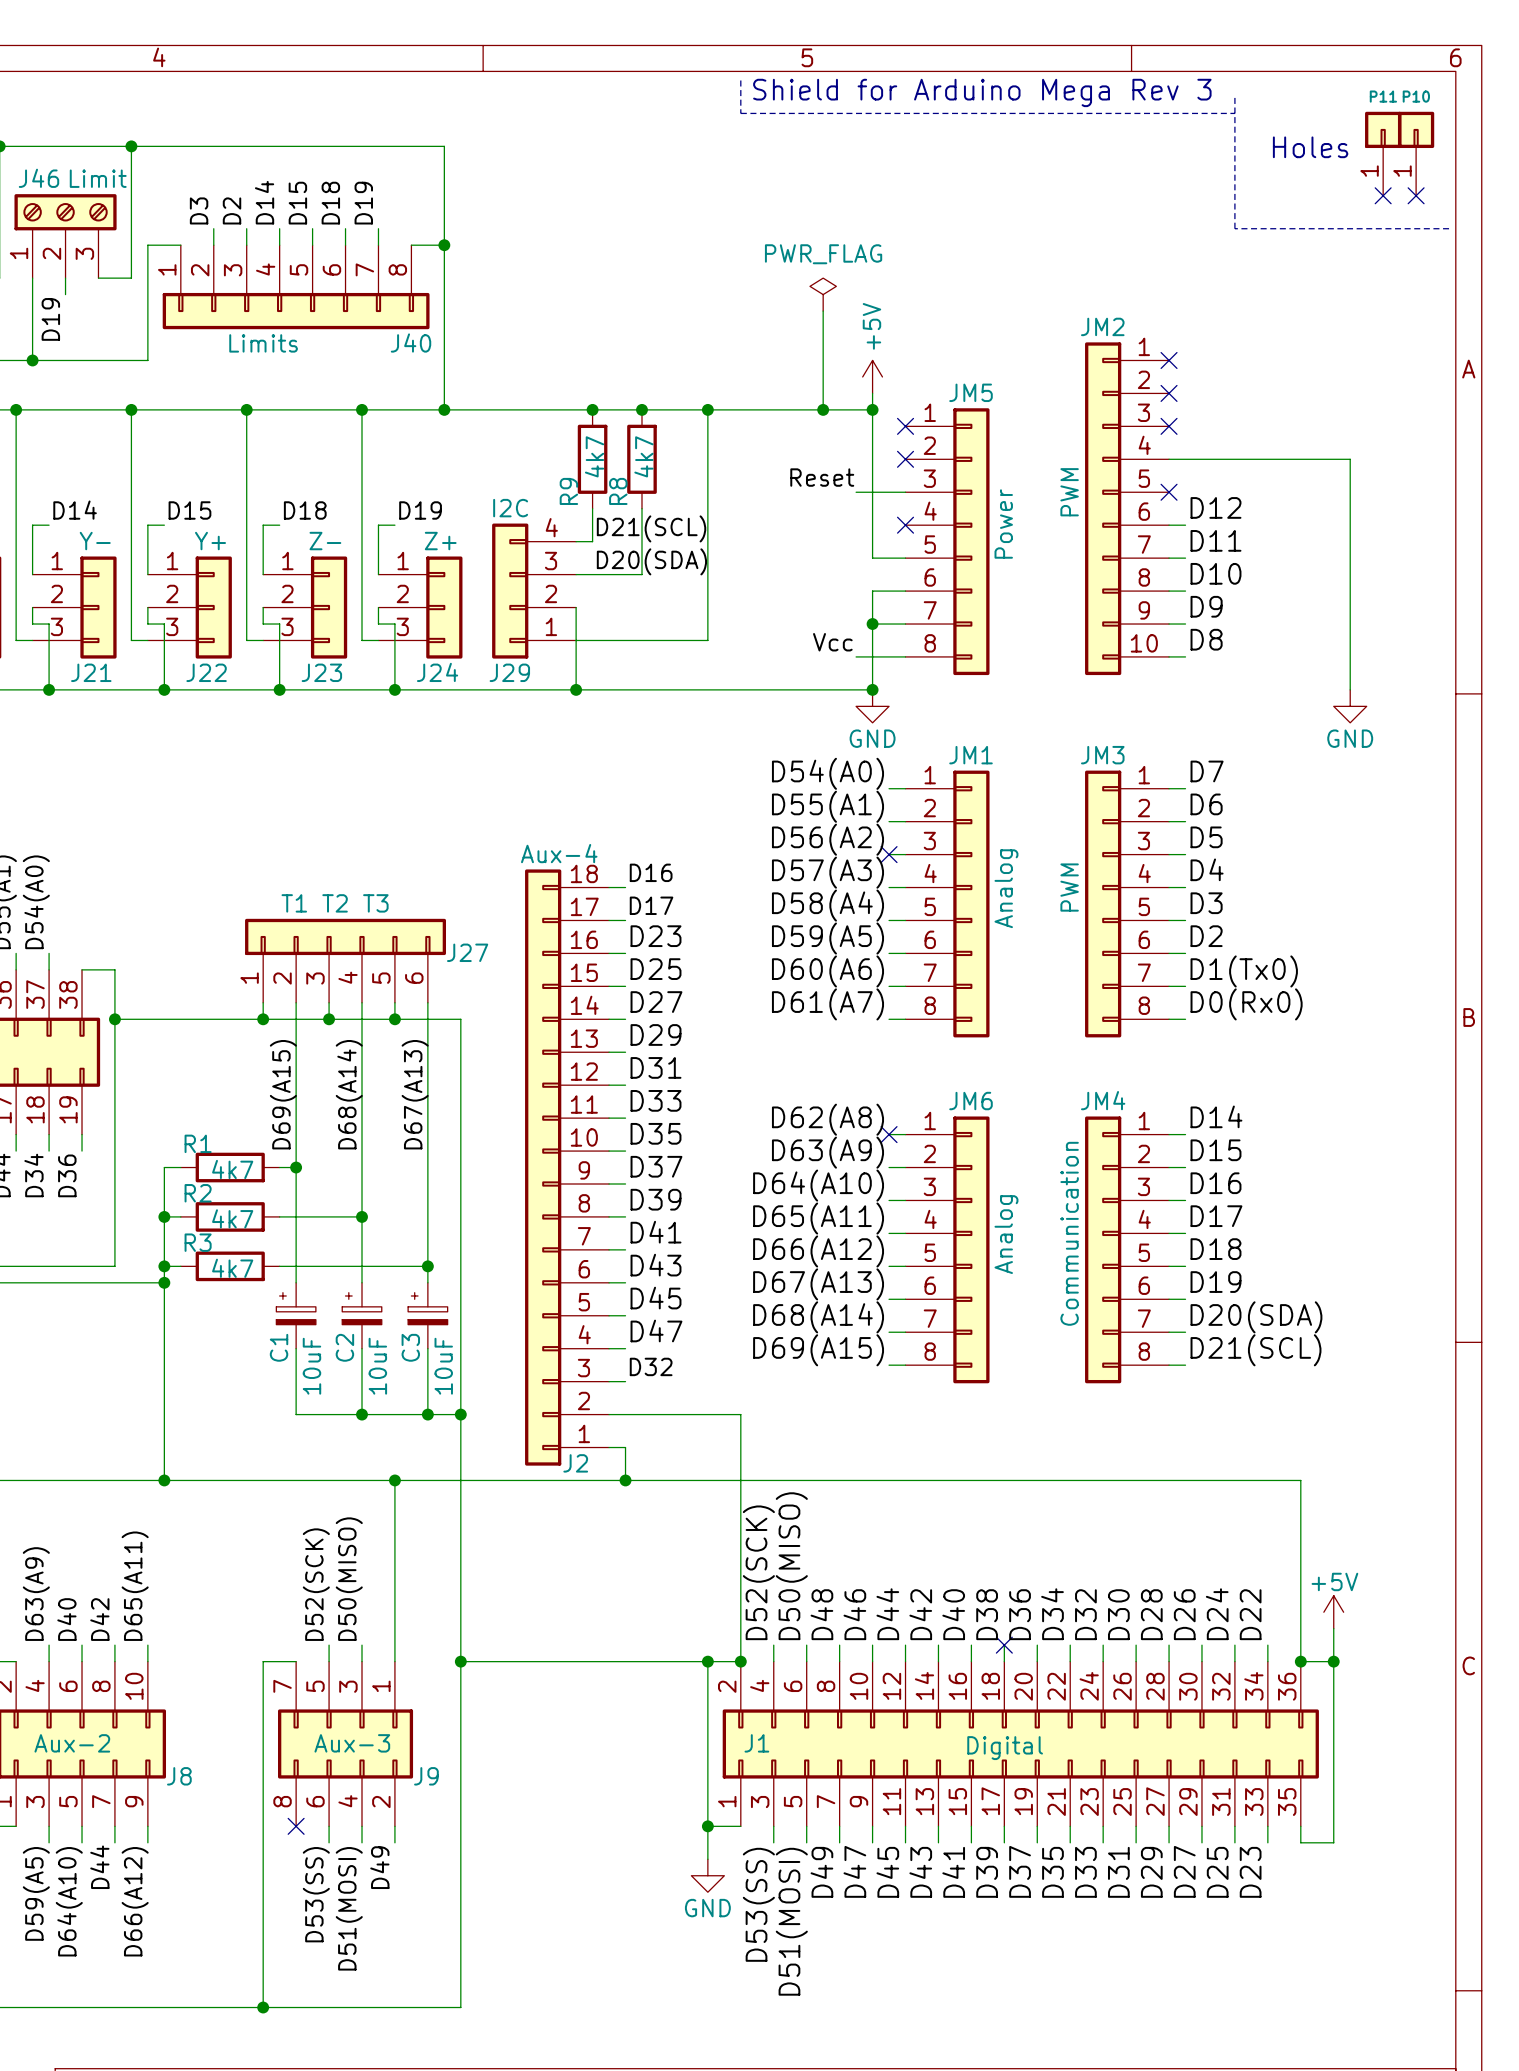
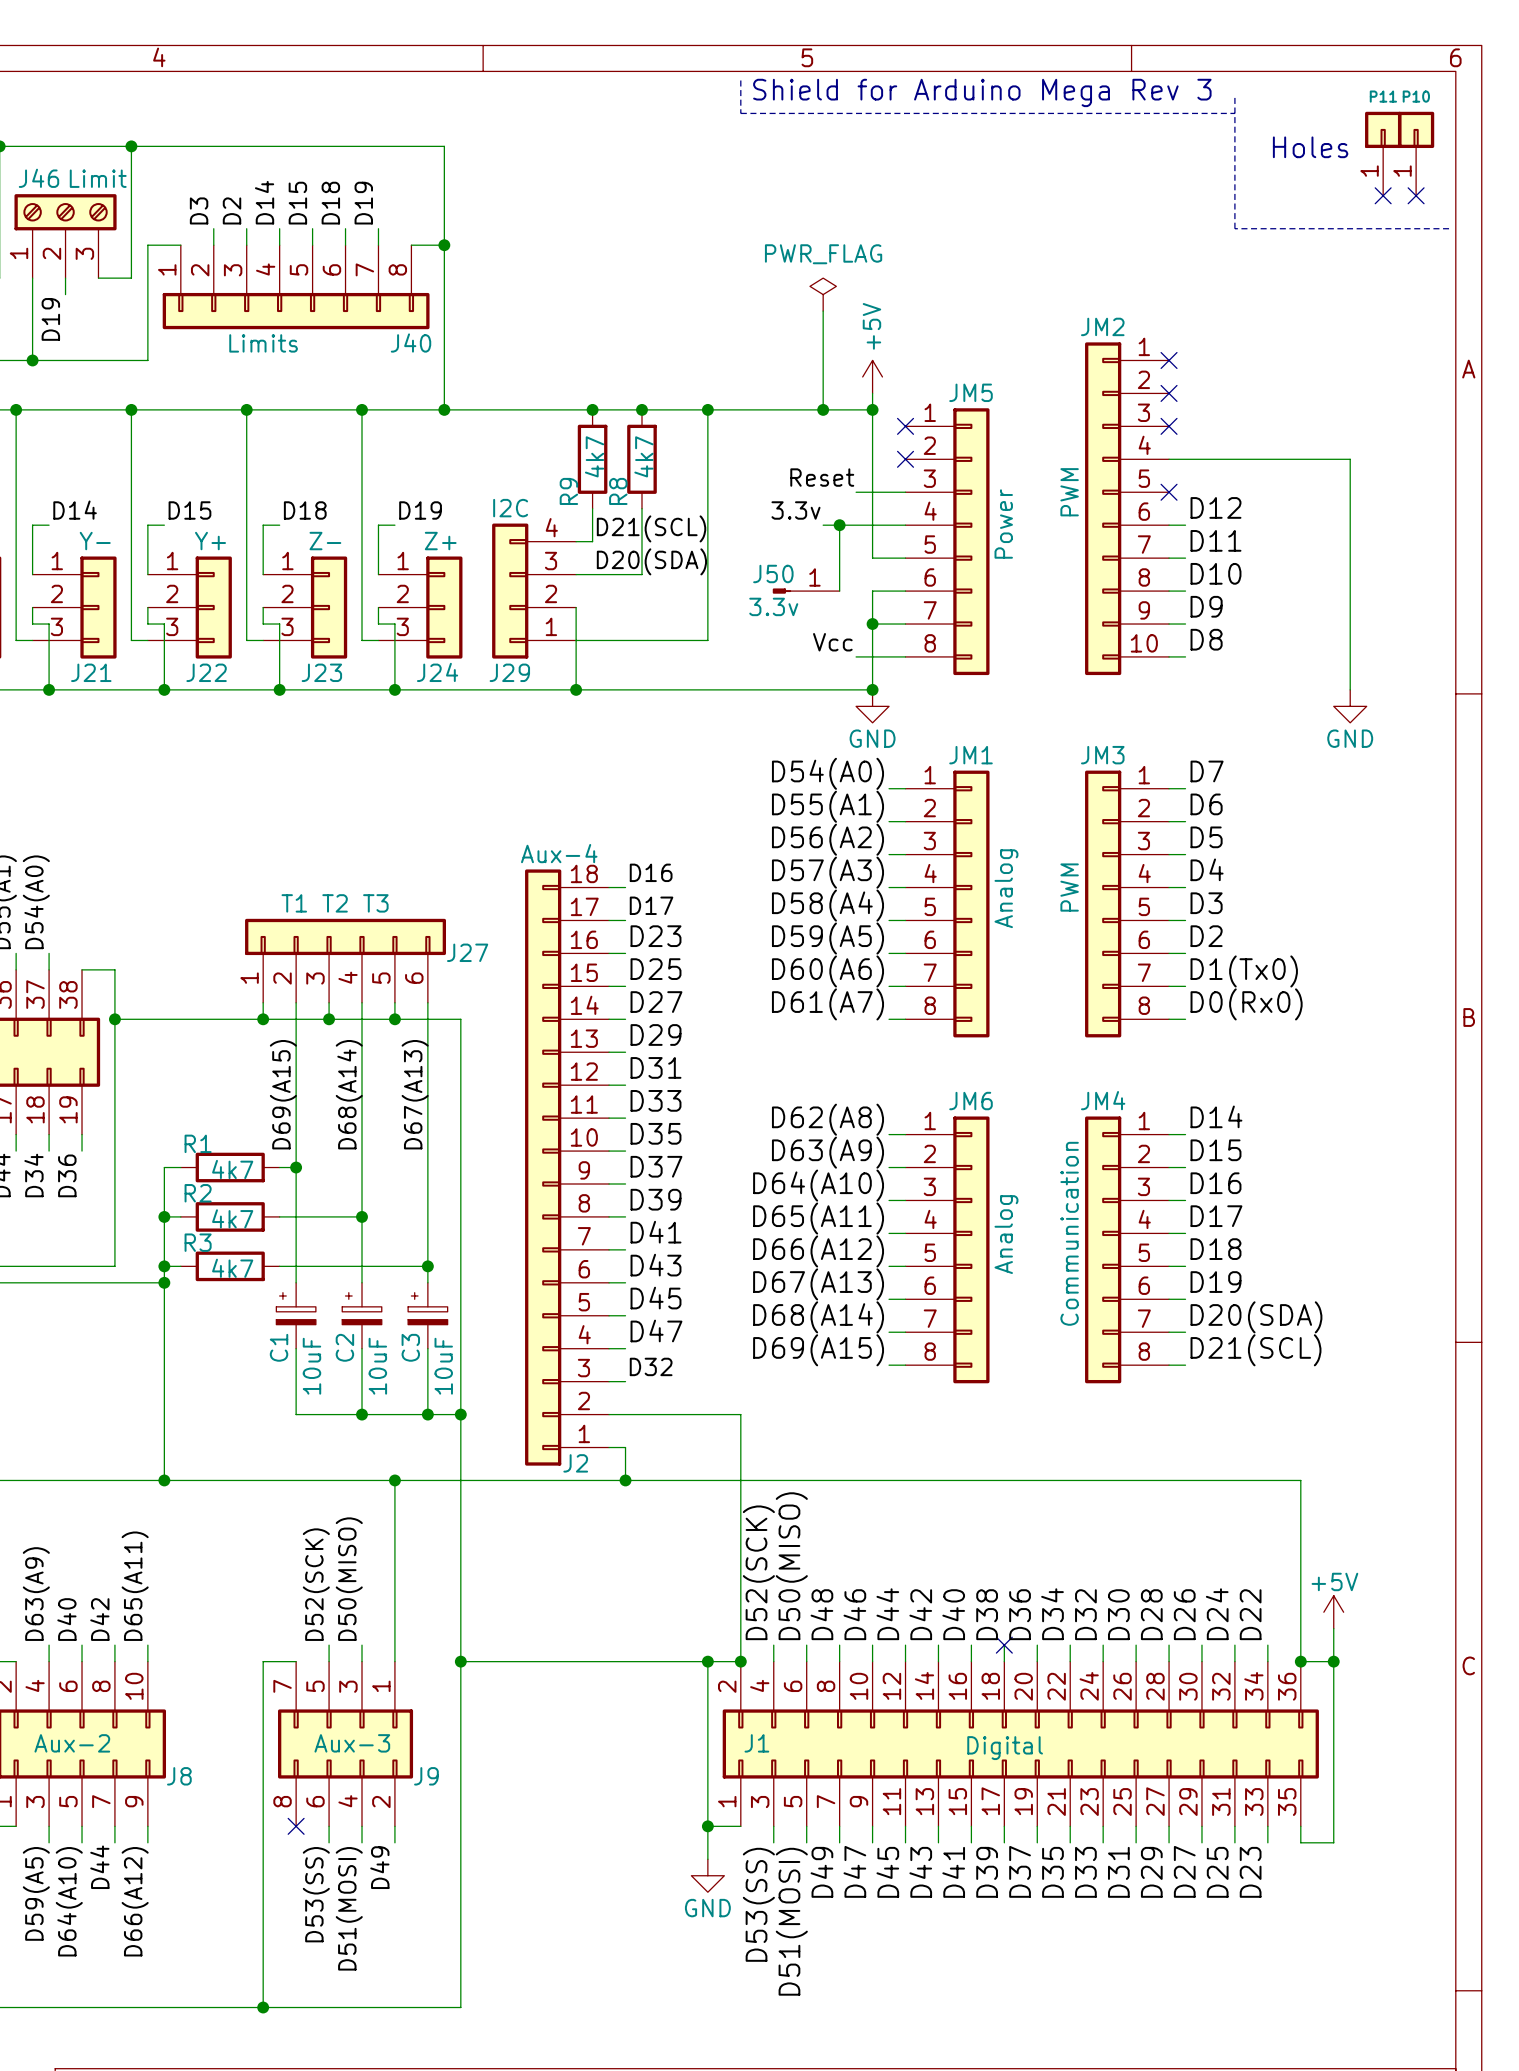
label: none -> 3.3v (795, 510)
wire: none -> (823, 525) (905, 525)
wire: none -> (839, 525) (839, 591)
junction: none -> (839, 525)
no-connect mark: (905, 525) -> none
J50: none -> 3.3v (806, 591)
no-connect mark: (889, 854) -> none
no-connect mark: (889, 1134) -> none

